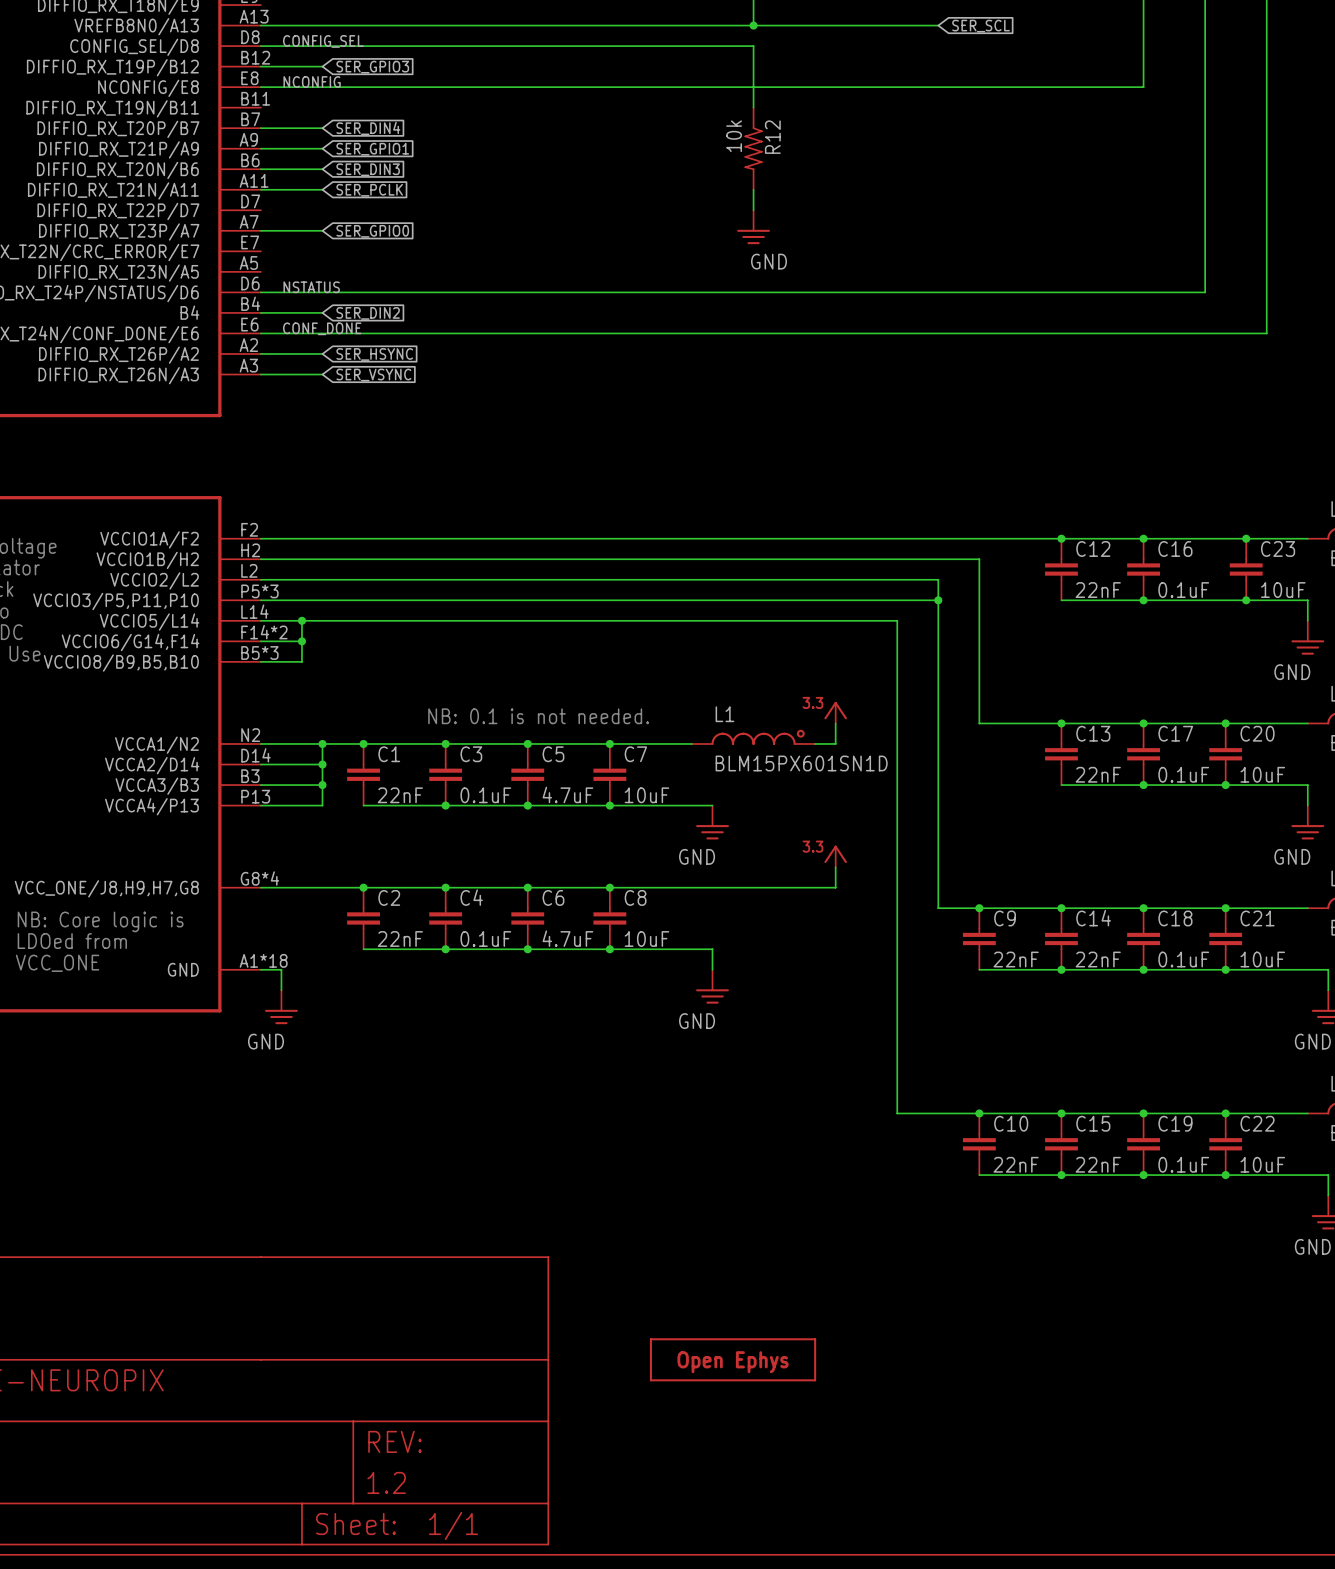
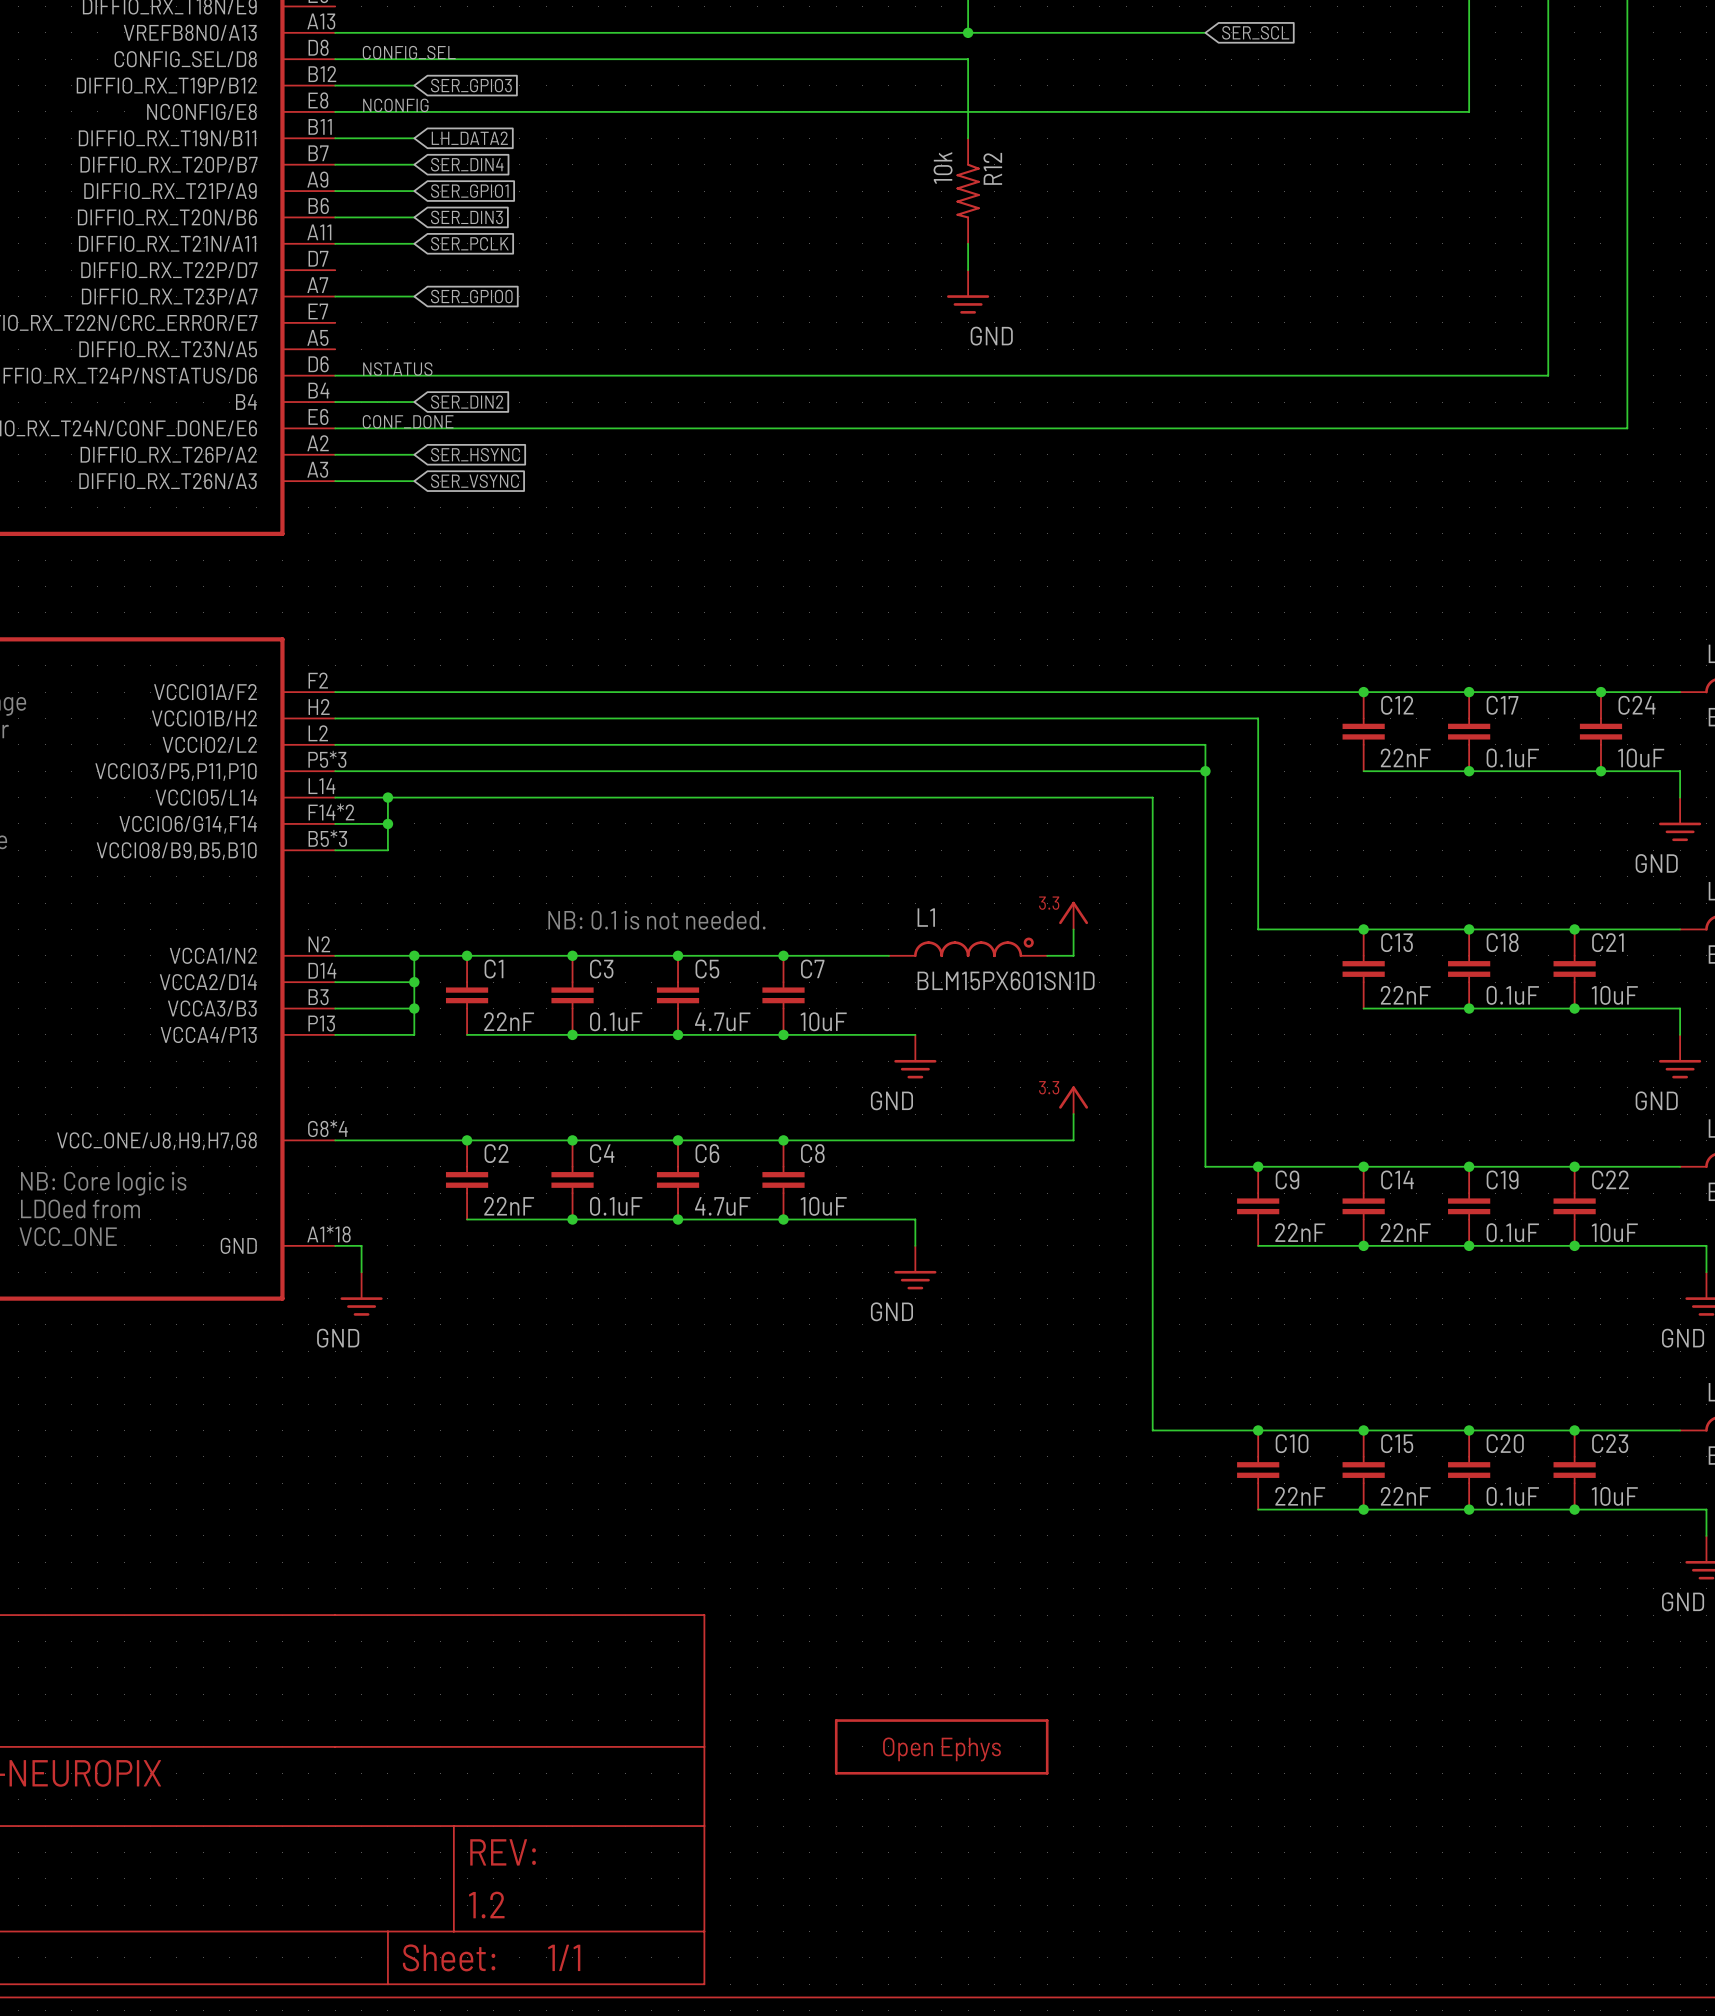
wire: none -> (335, 138) (414, 138)
global label: none -> LH_DATA2 (469, 138)
C16 name: C16 (1175, 548) -> C17 (1502, 705)
C23 name: C23 (1278, 548) -> C24 (1637, 705)
C17 name: C17 (1175, 733) -> C18 (1502, 942)
C20 name: C20 (1257, 733) -> C21 (1607, 942)
C18 name: C18 (1175, 918) -> C19 (1502, 1179)
C21 name: C21 (1257, 918) -> C22 (1610, 1179)
C19 name: C19 (1175, 1123) -> C20 (1505, 1443)
C22 name: C22 (1257, 1123) -> C23 (1610, 1443)

